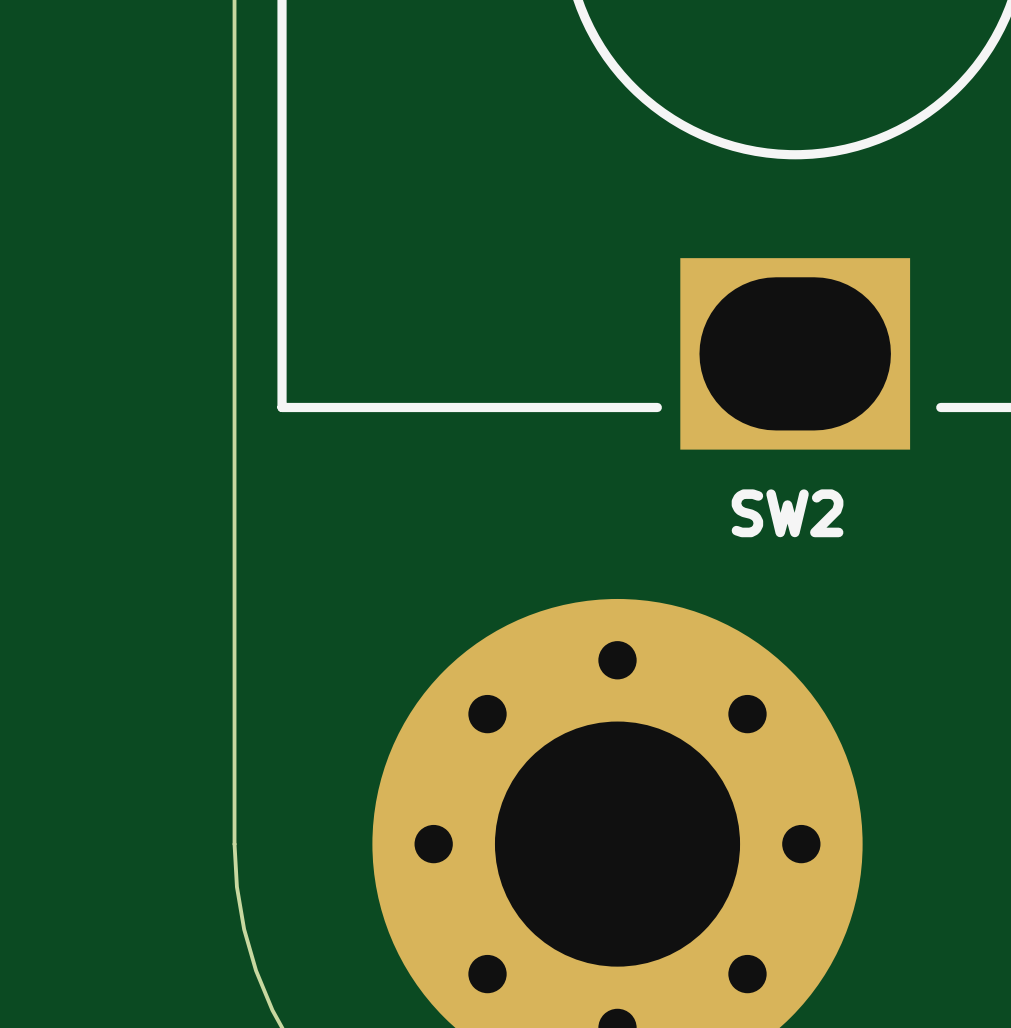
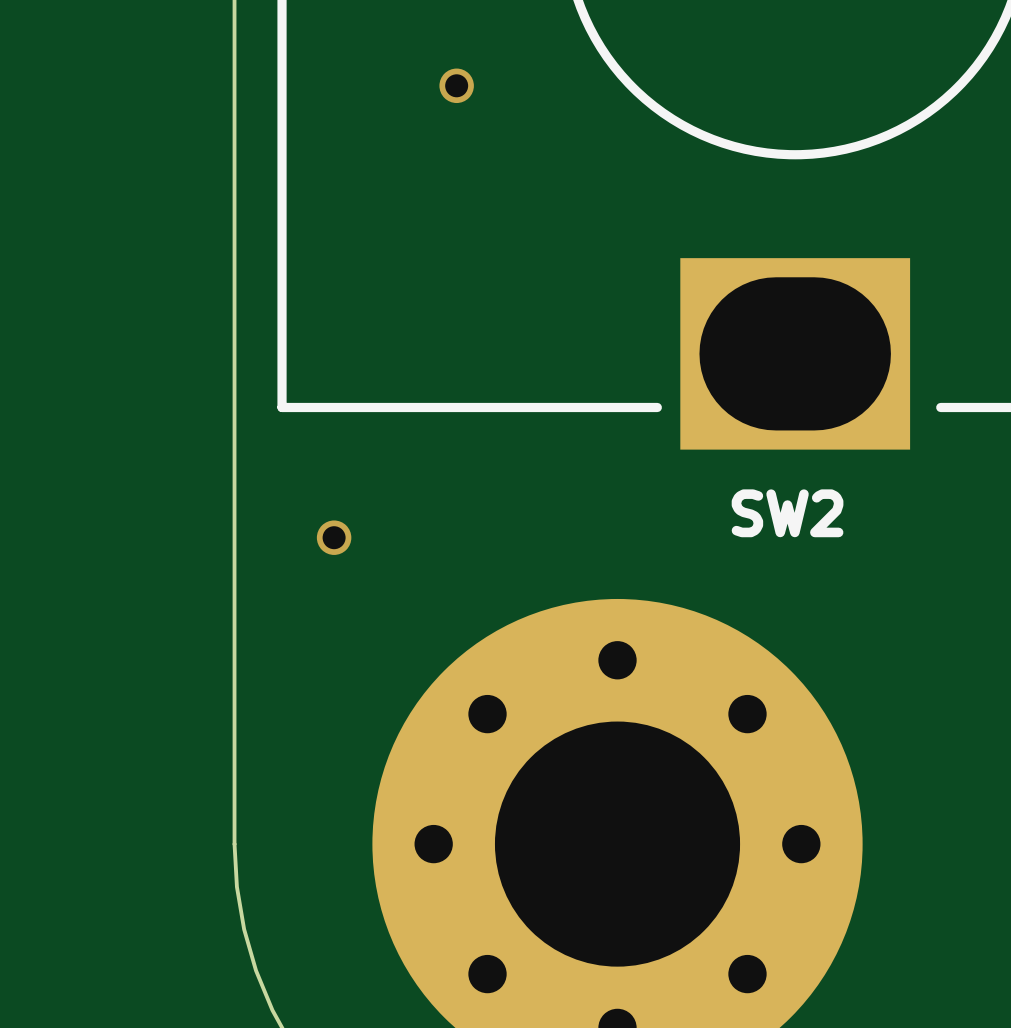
via: none -> (456, 85)
via: none -> (334, 537)

